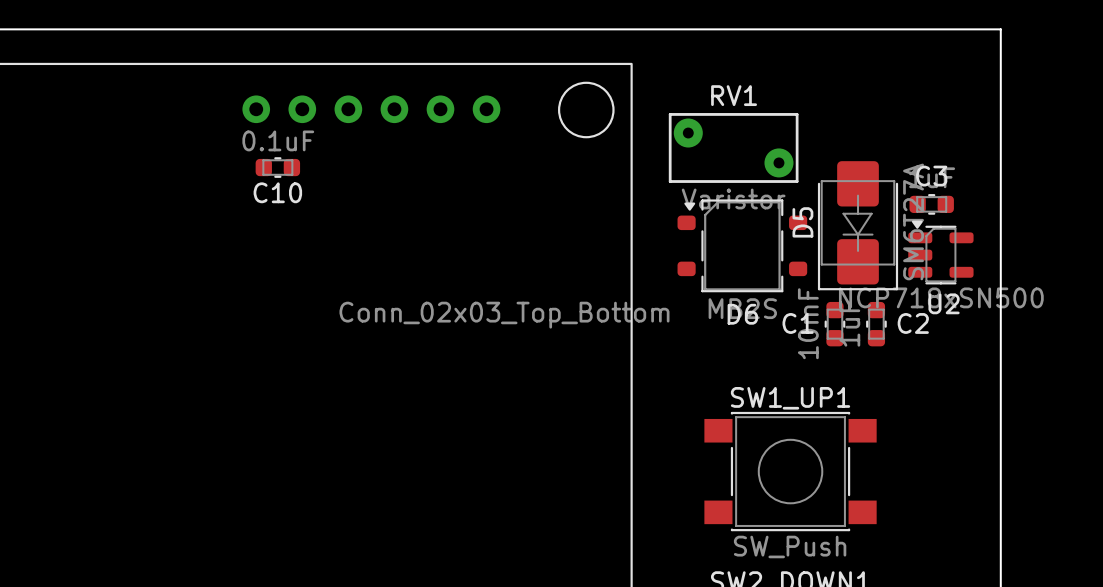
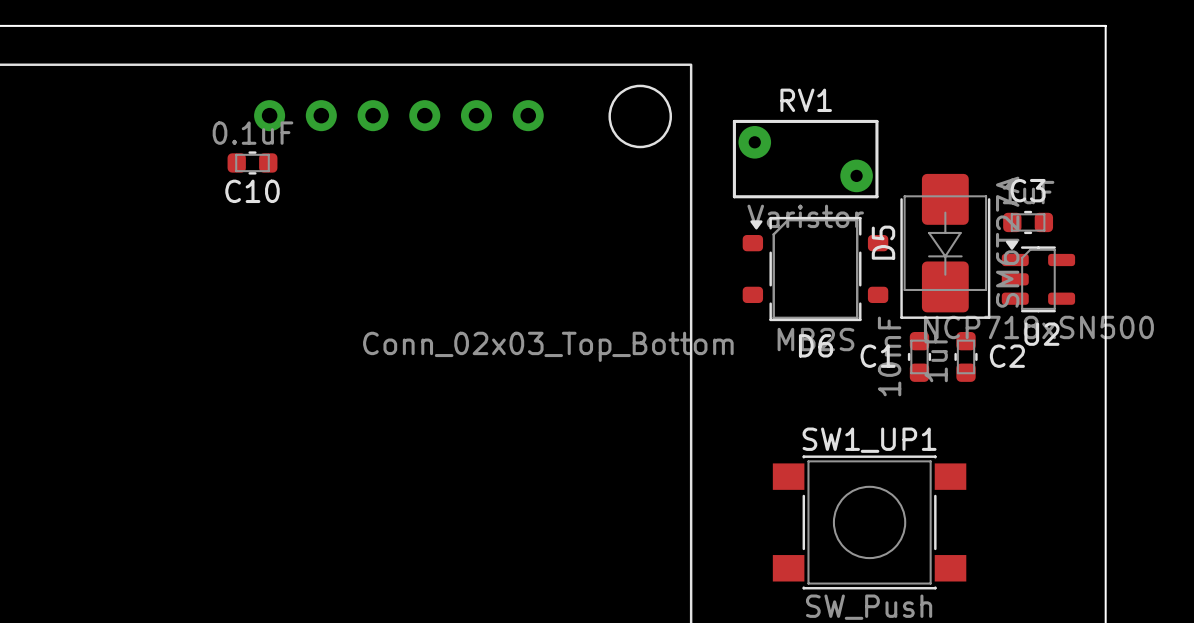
C10 position: (277, 167) -> (252, 162)

